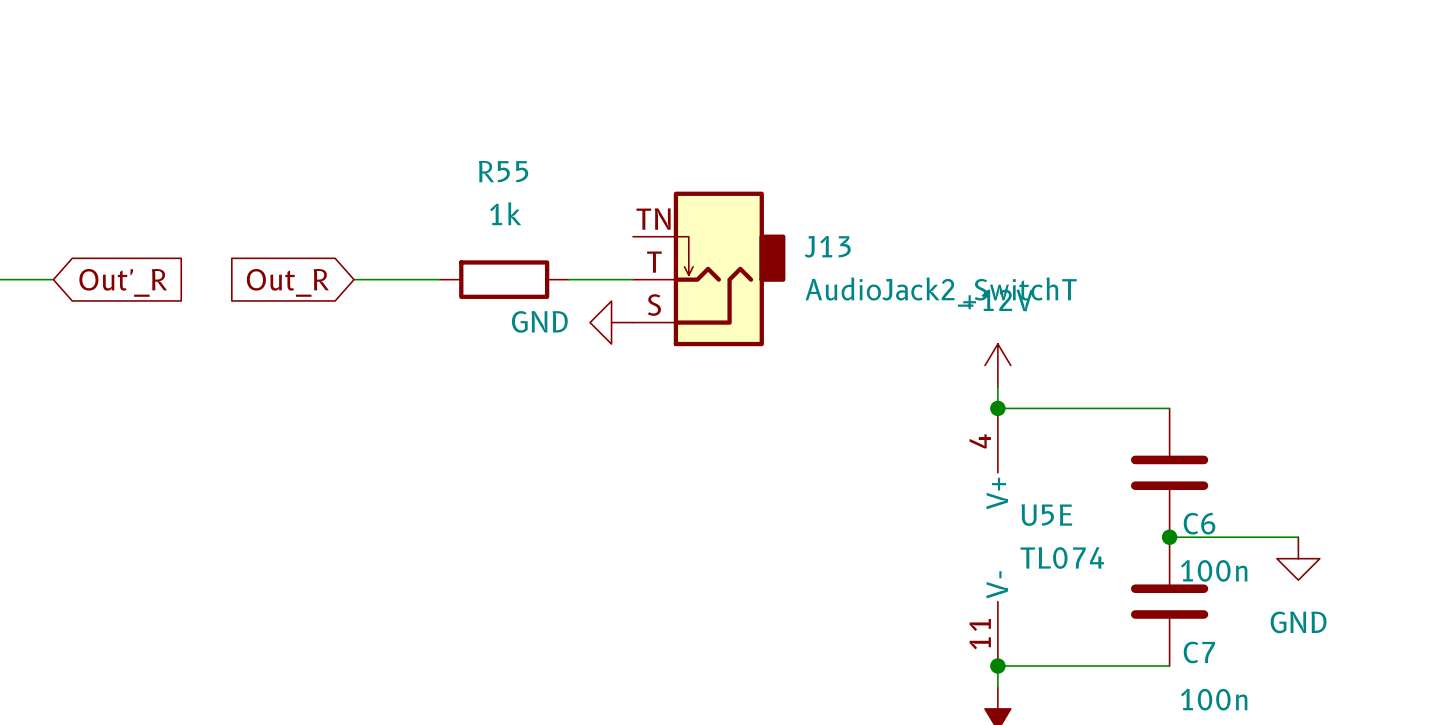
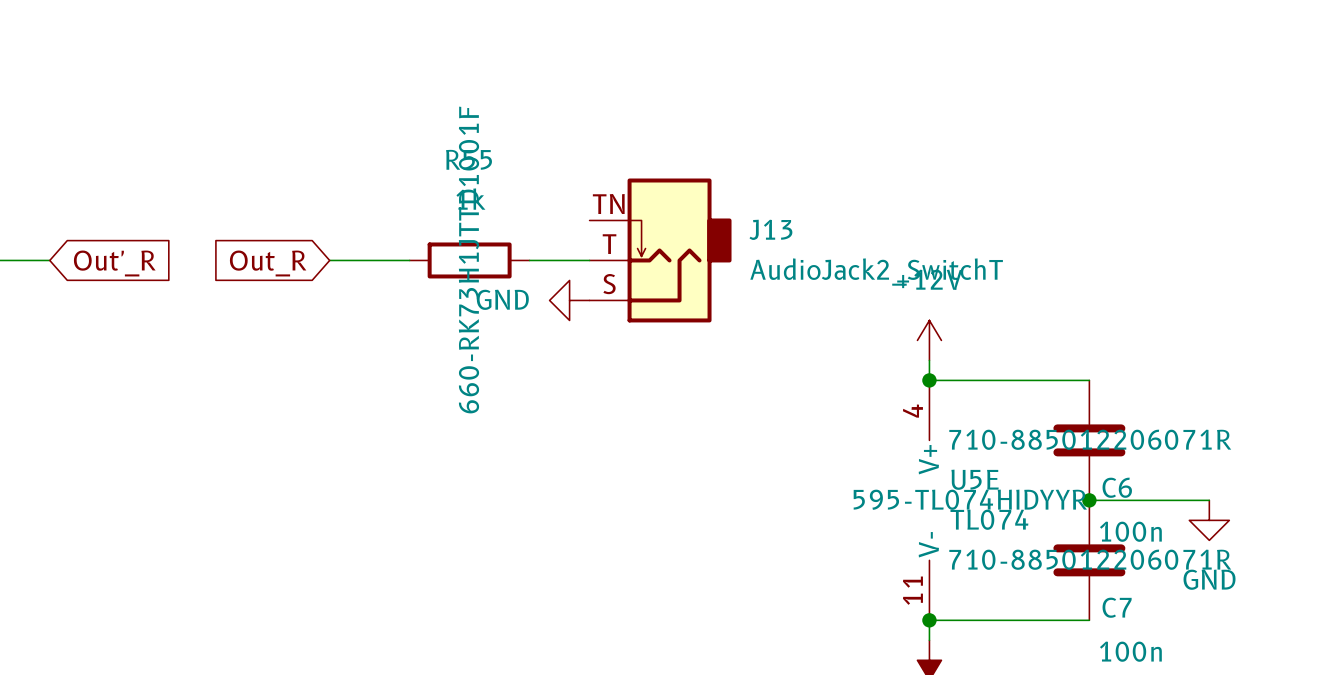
R55 text: none -> 660-RK73H1JTTD1001F (468, 260)
C6 text: none -> 710-885012206071R (1090, 439)
U5E text: none -> 595-TL074HIDYYR (970, 499)
C7 text: none -> 710-885012206071R (1090, 559)

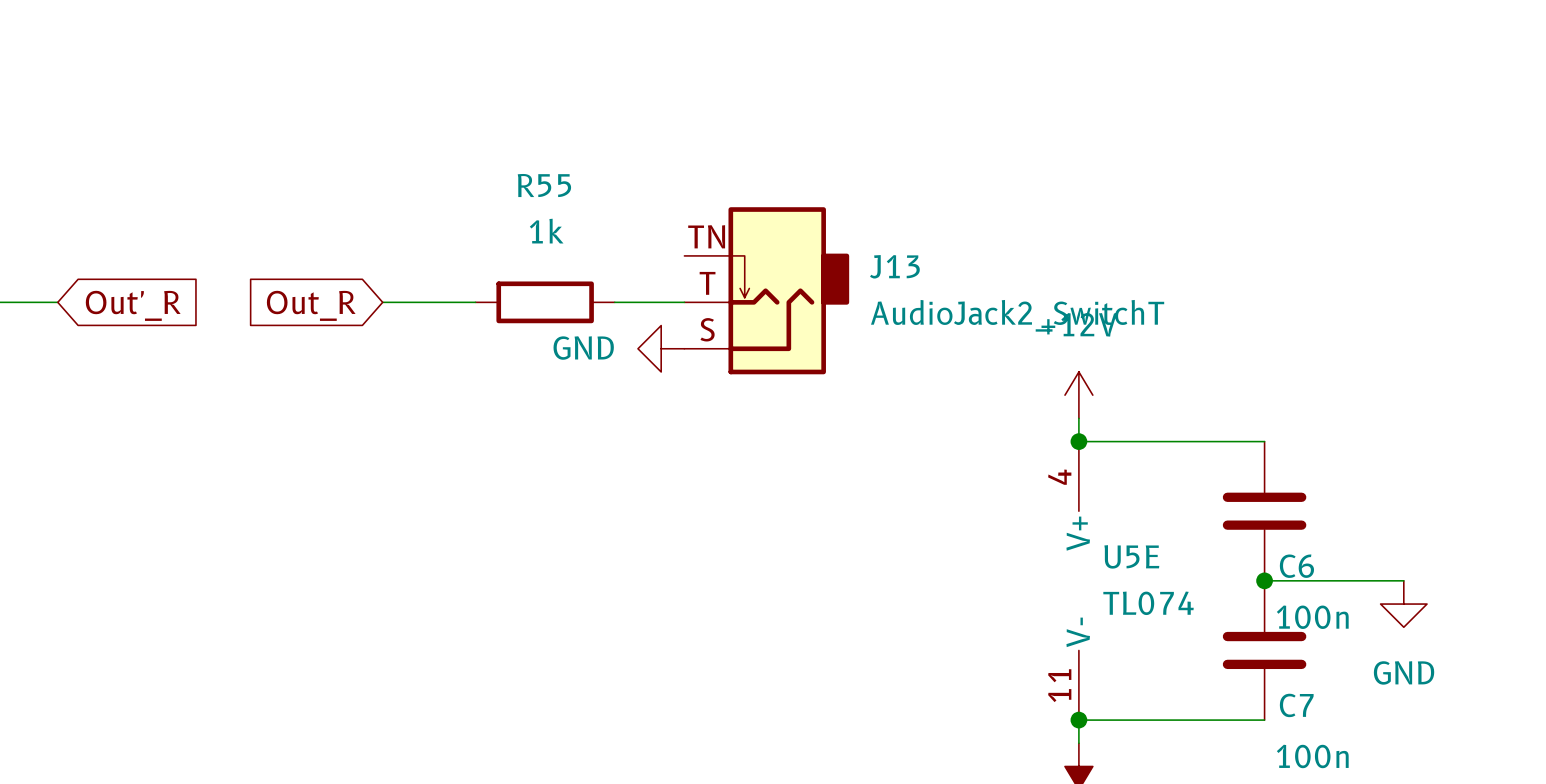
R55 text: 660-RK73H1JTTD1001F (468, 260) -> none
C6 text: 710-885012206071R (1090, 439) -> none
U5E text: 595-TL074HIDYYR (970, 499) -> none
C7 text: 710-885012206071R (1090, 559) -> none

